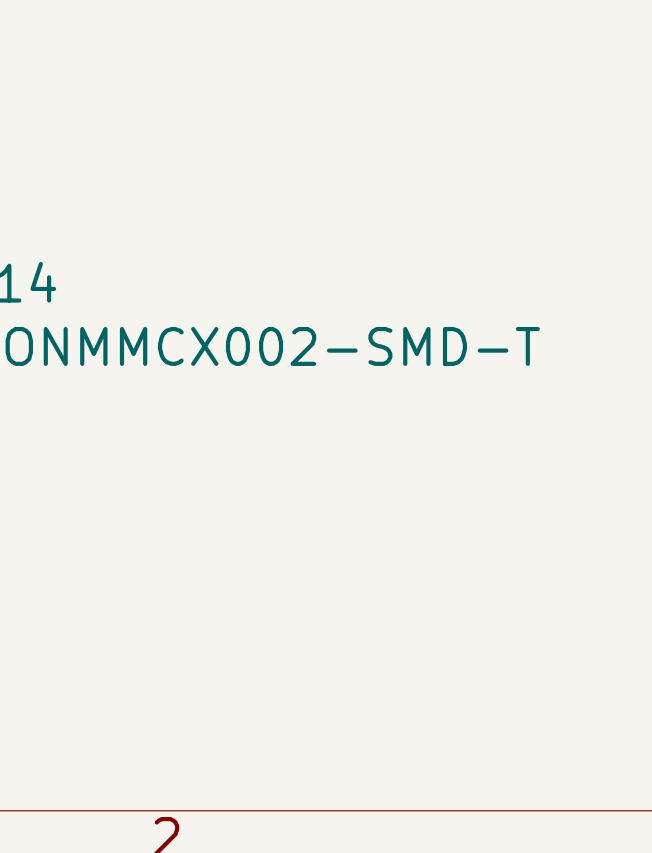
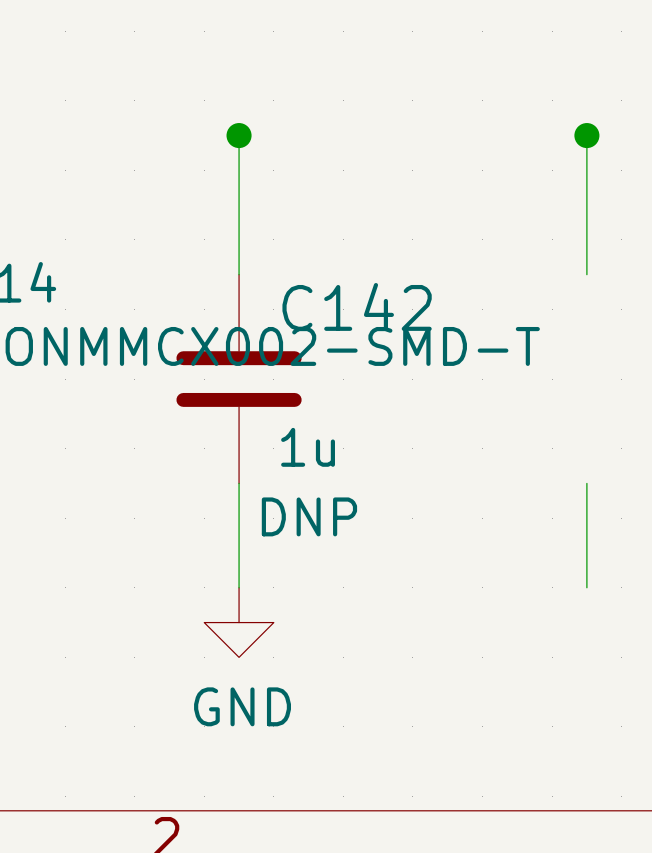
wire: none -> (239, 135) (239, 274)
junction: none -> (239, 135)
wire: none -> (586, 135) (586, 274)
junction: none -> (586, 135)
C142: none -> (239, 379)
wire: none -> (239, 483) (239, 587)
wire: none -> (586, 483) (586, 587)
power symbol: none -> GND (239, 622)

